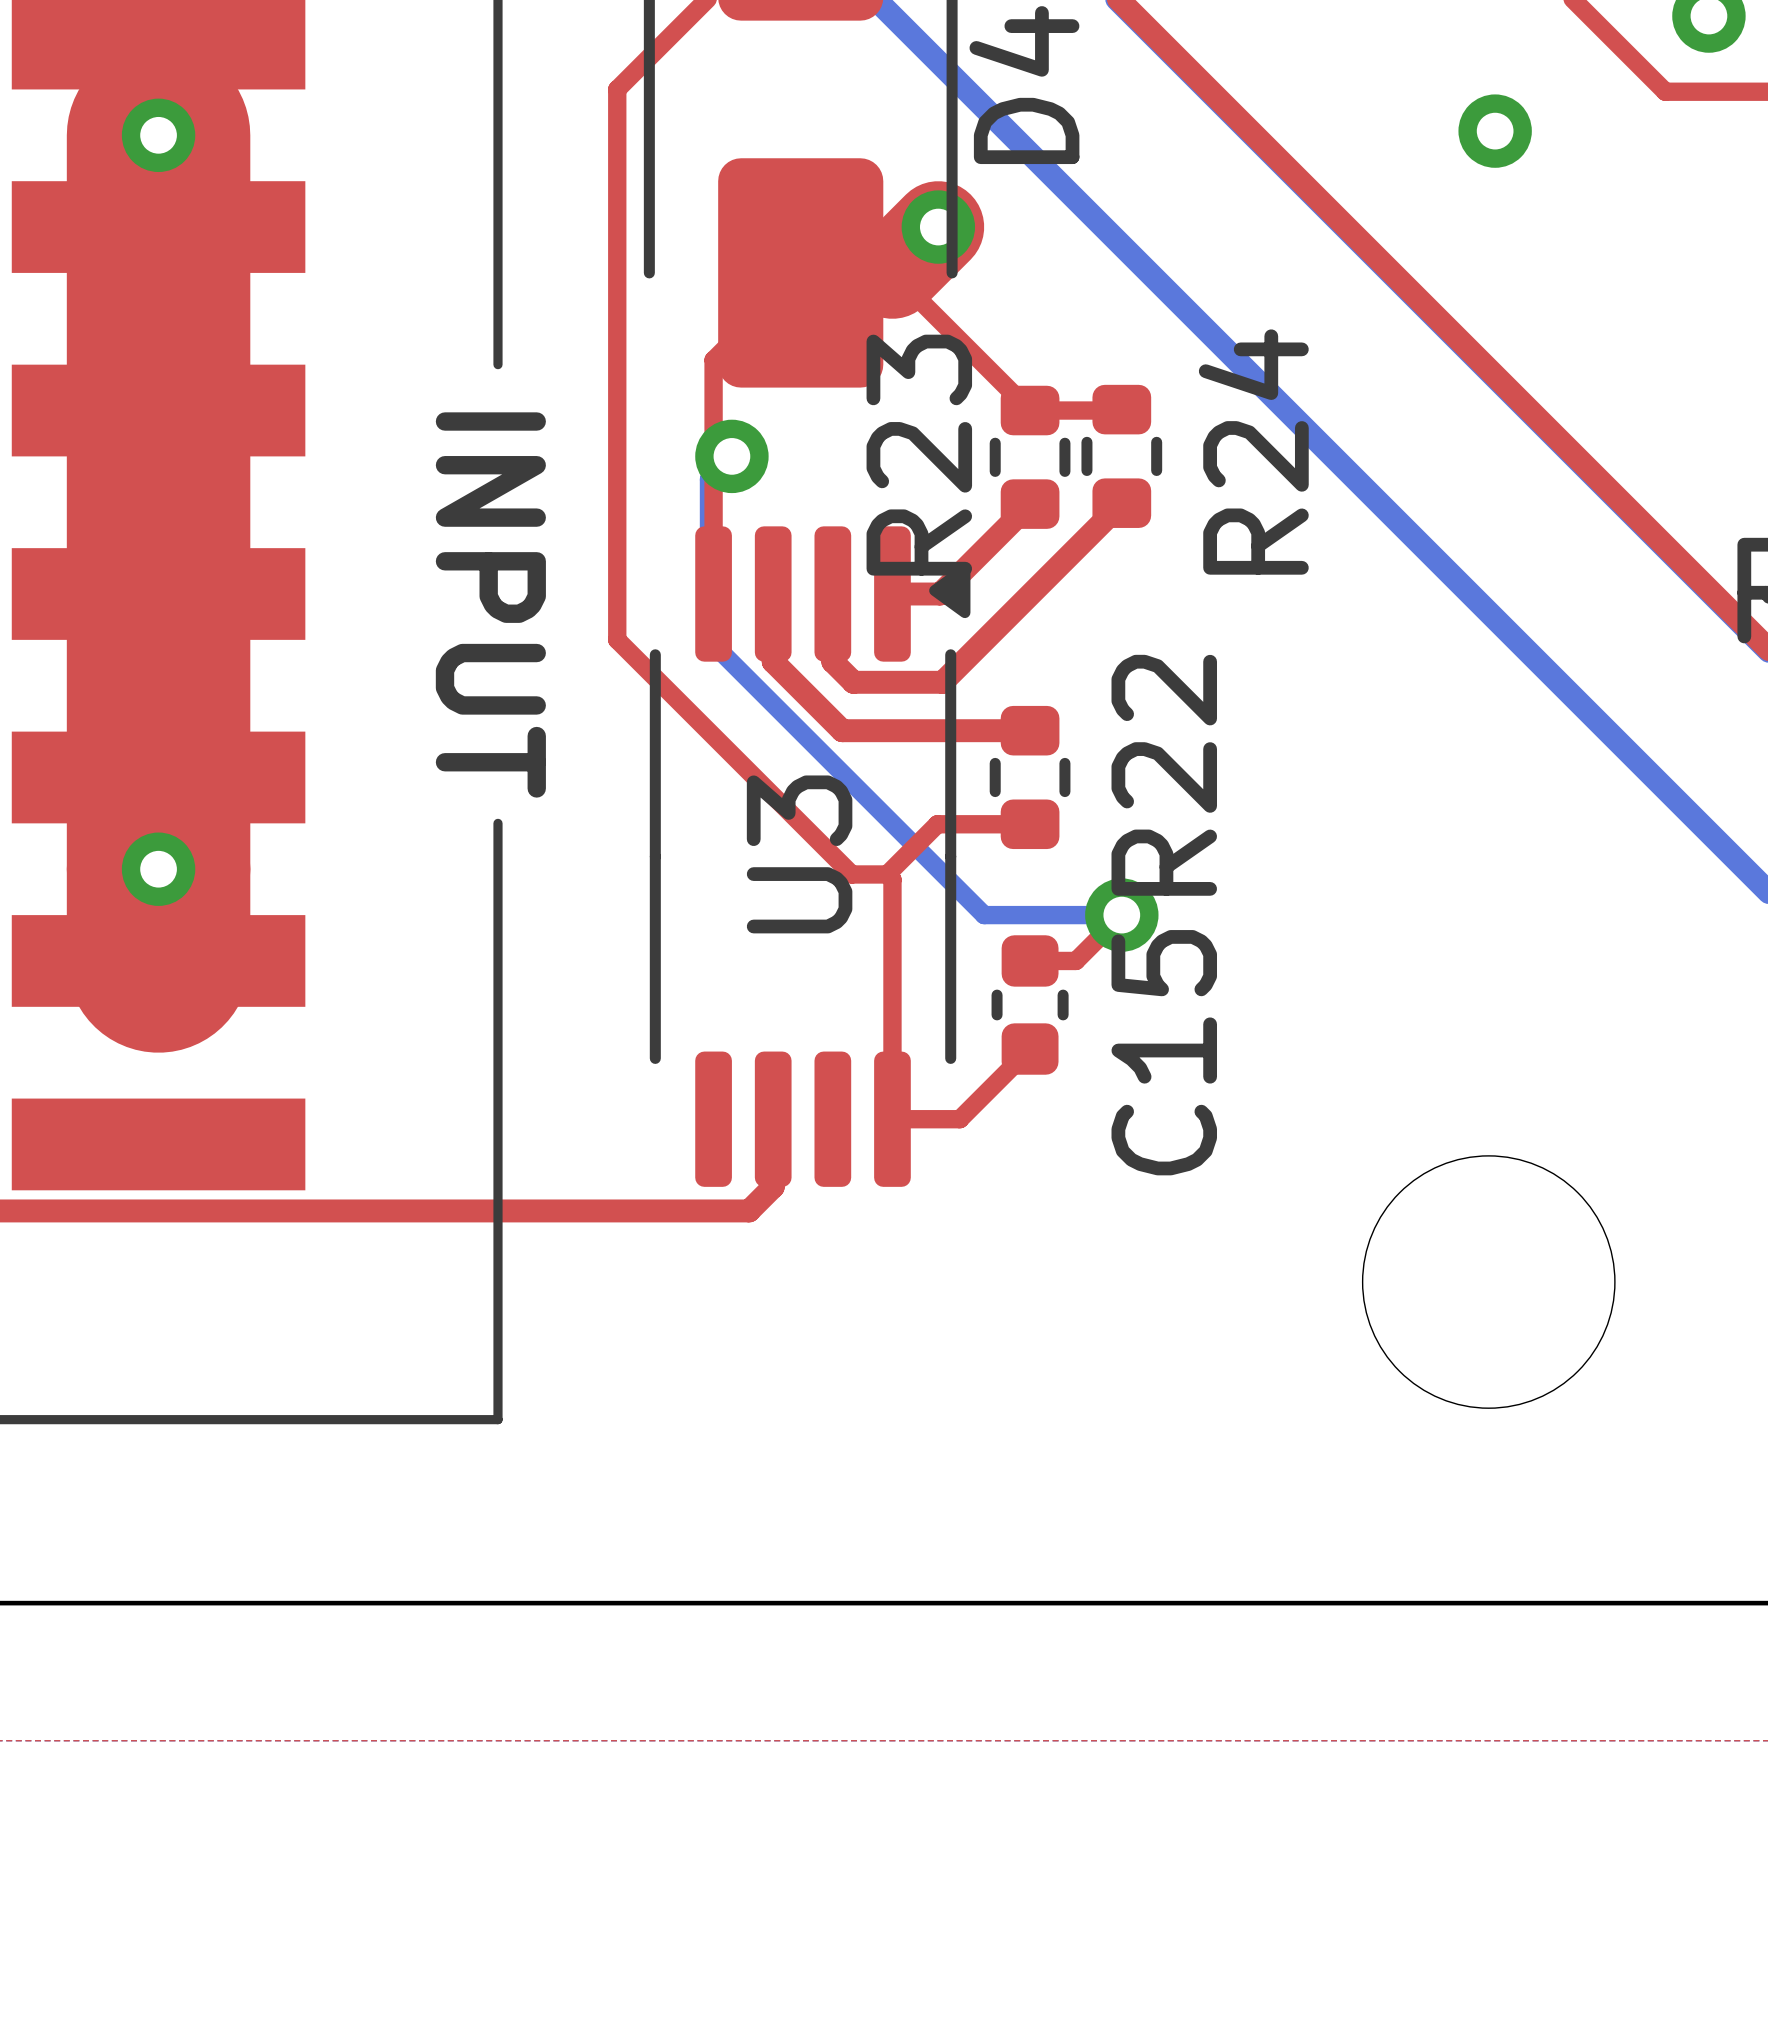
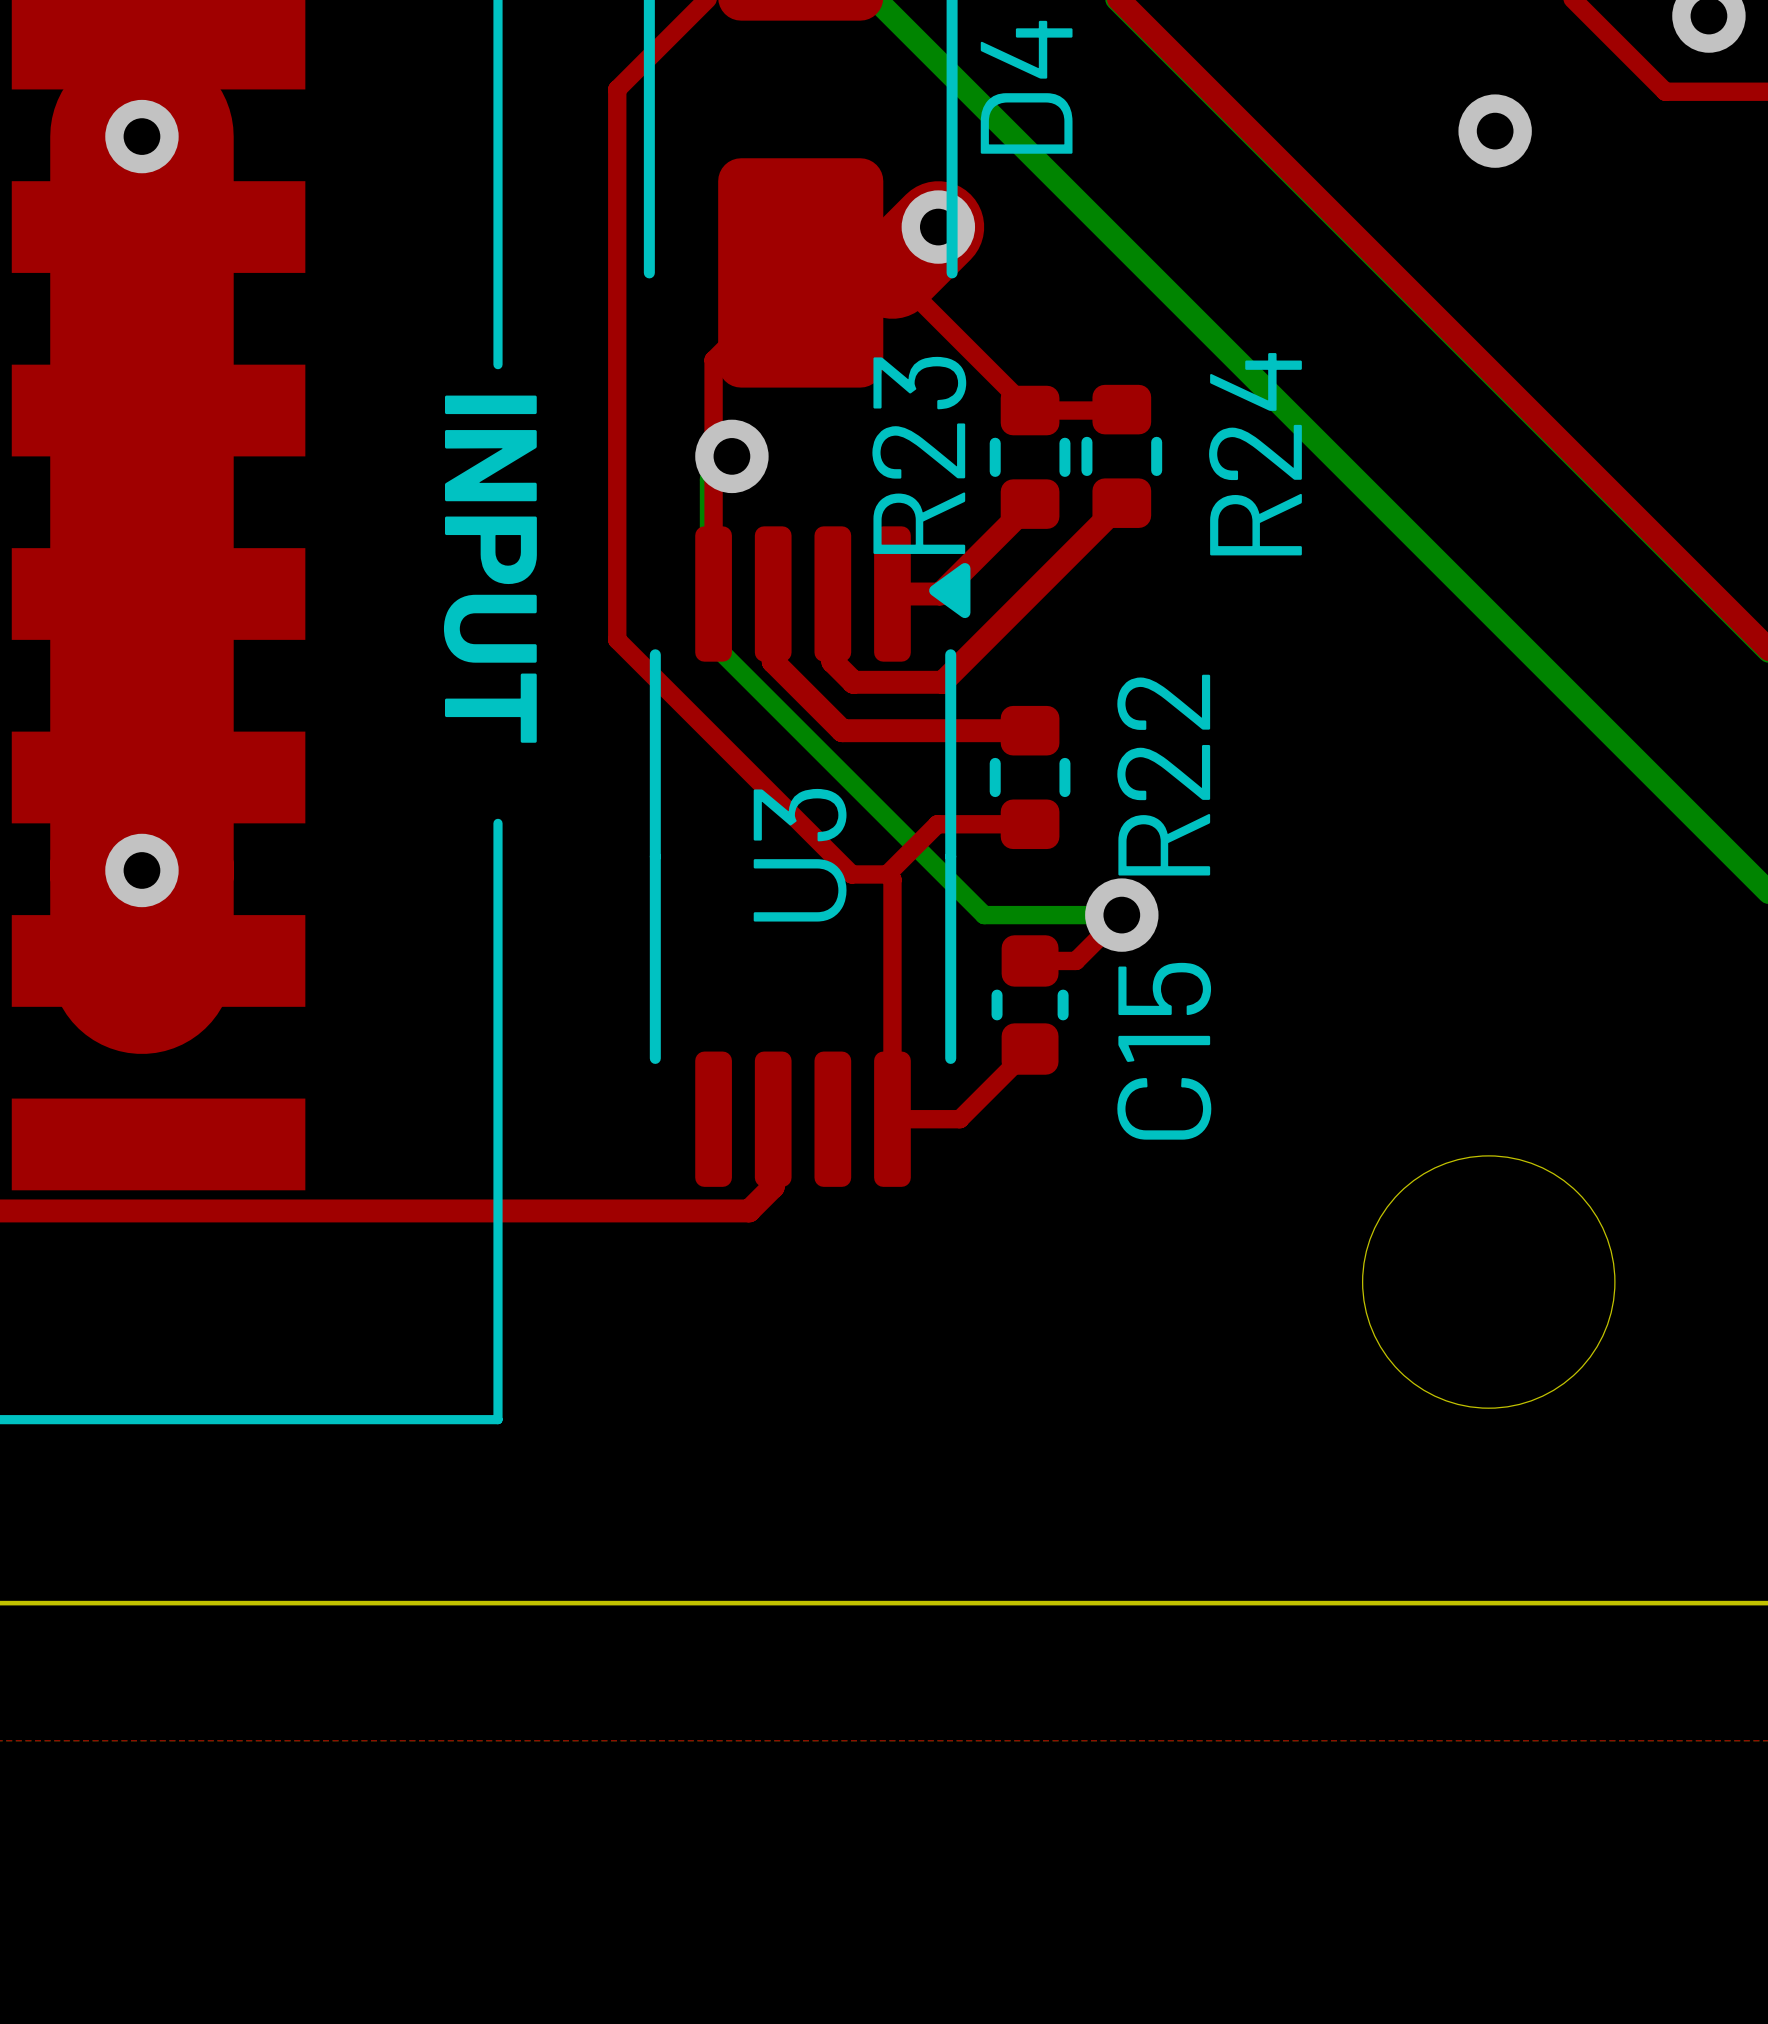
top track: (158, 135) (158, 960) -> (141, 136) (141, 962)
via position: (158, 135) -> (141, 136)
via position: (158, 869) -> (141, 870)

